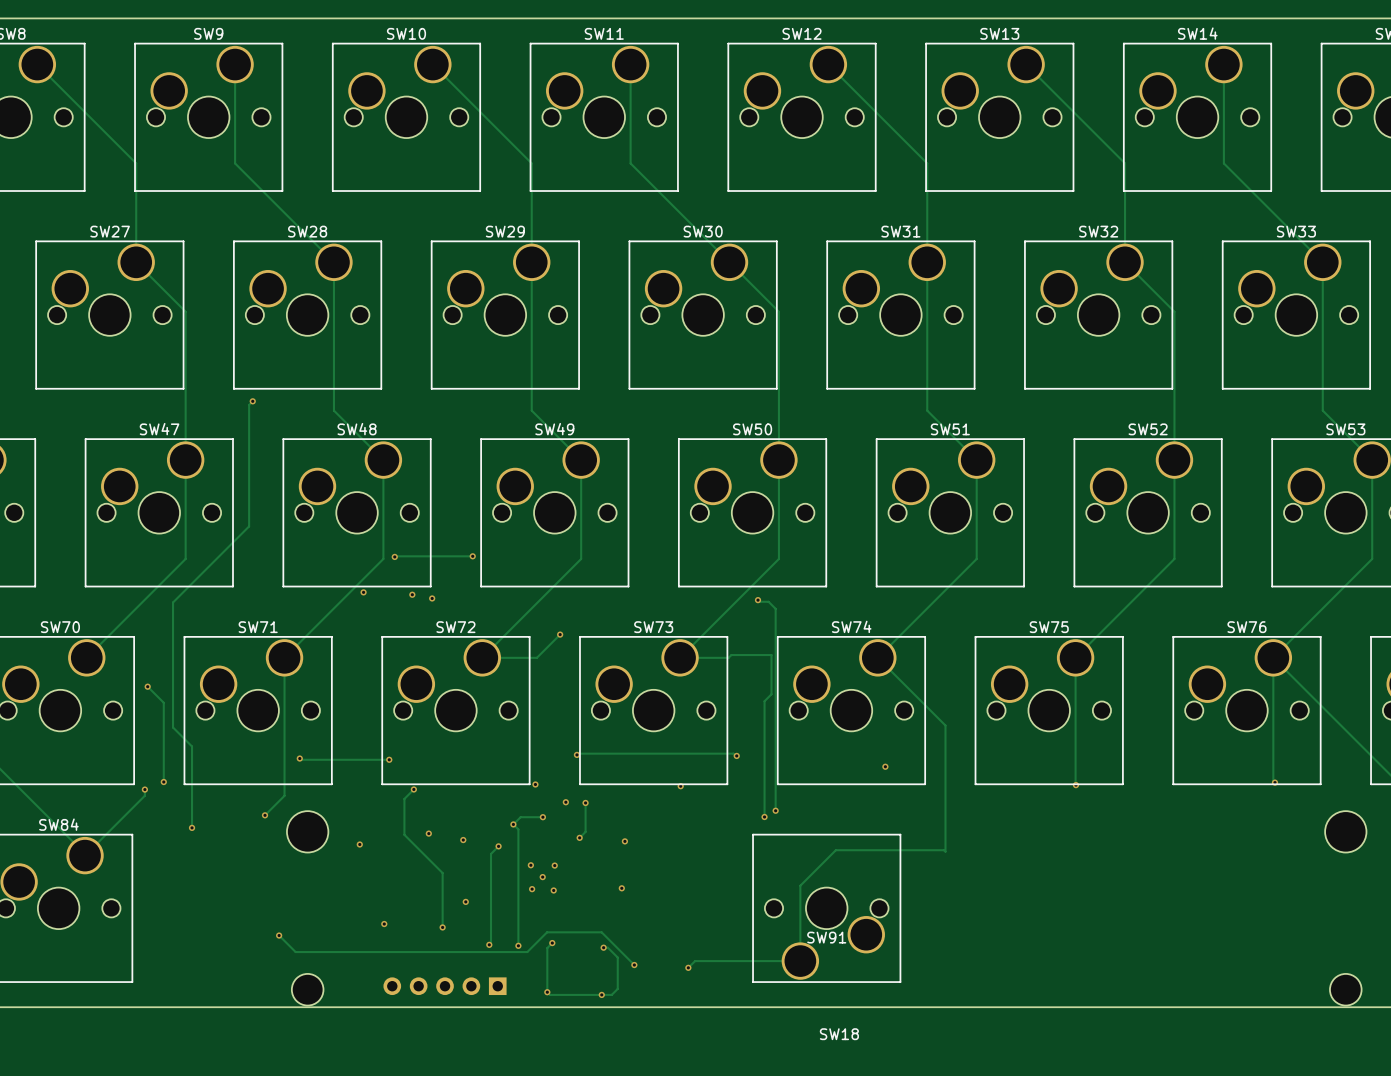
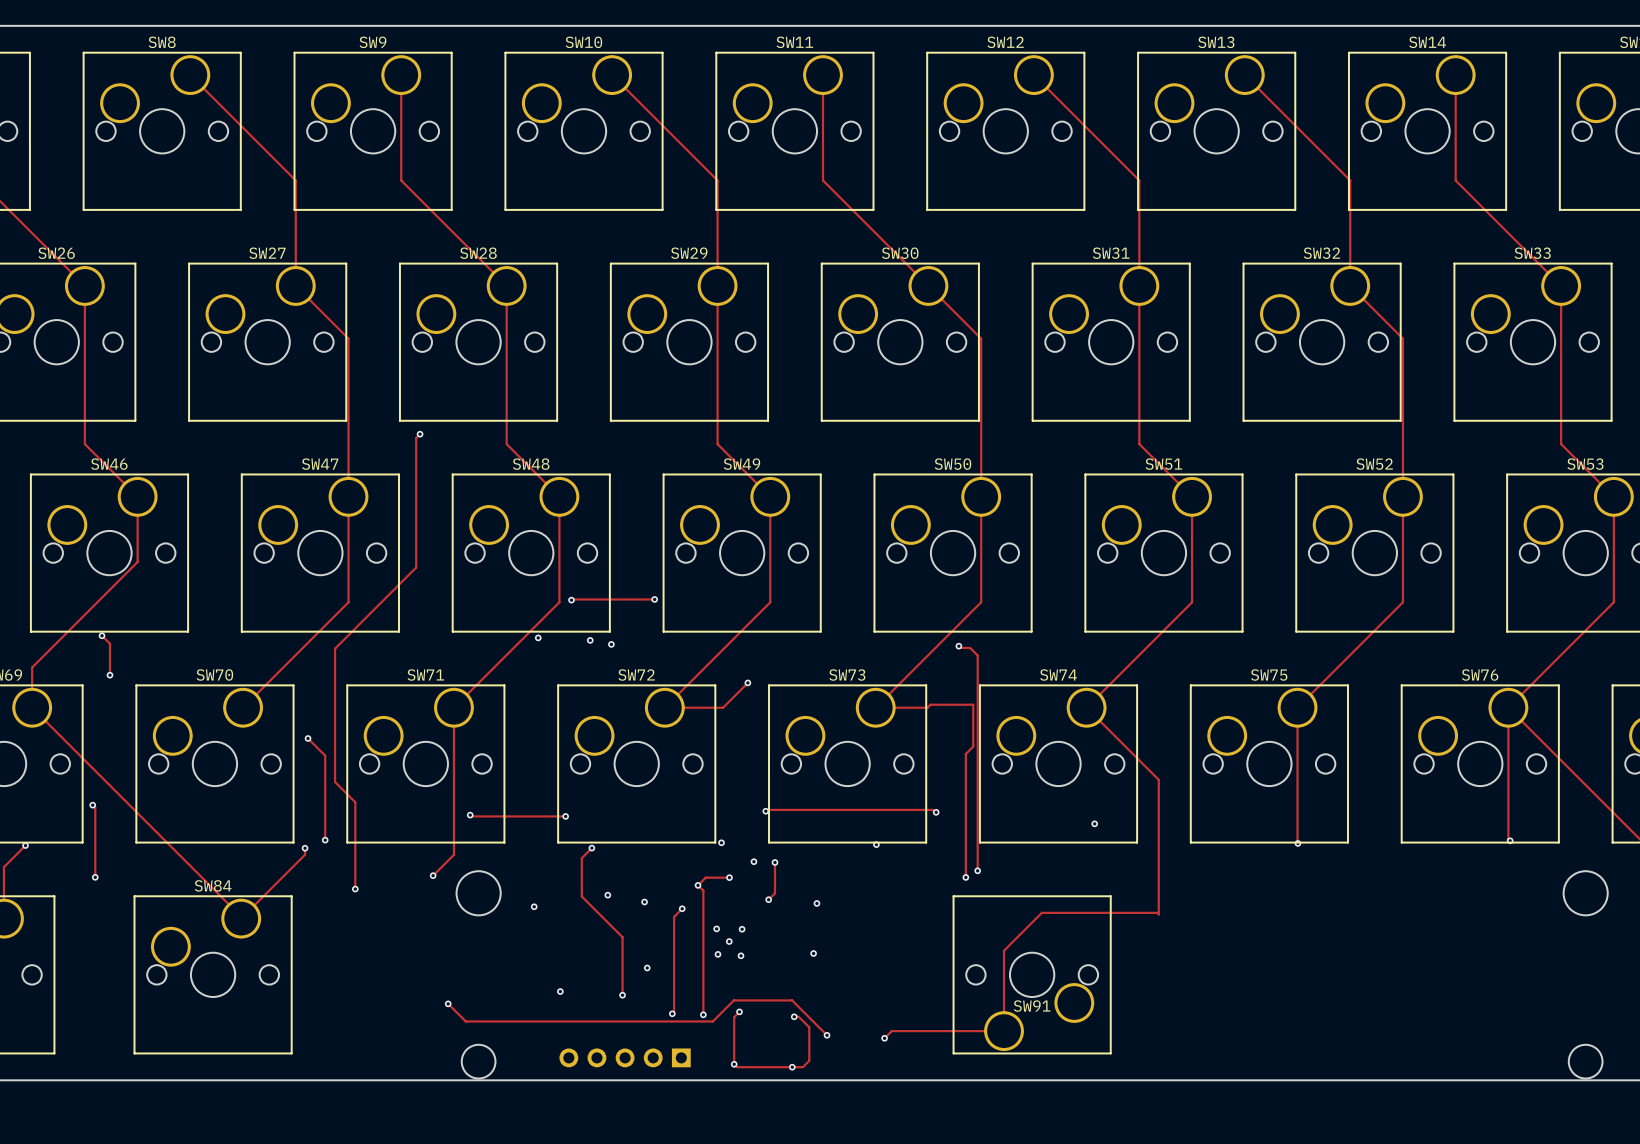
SW18 name: SW18 (839, 1034) -> none

